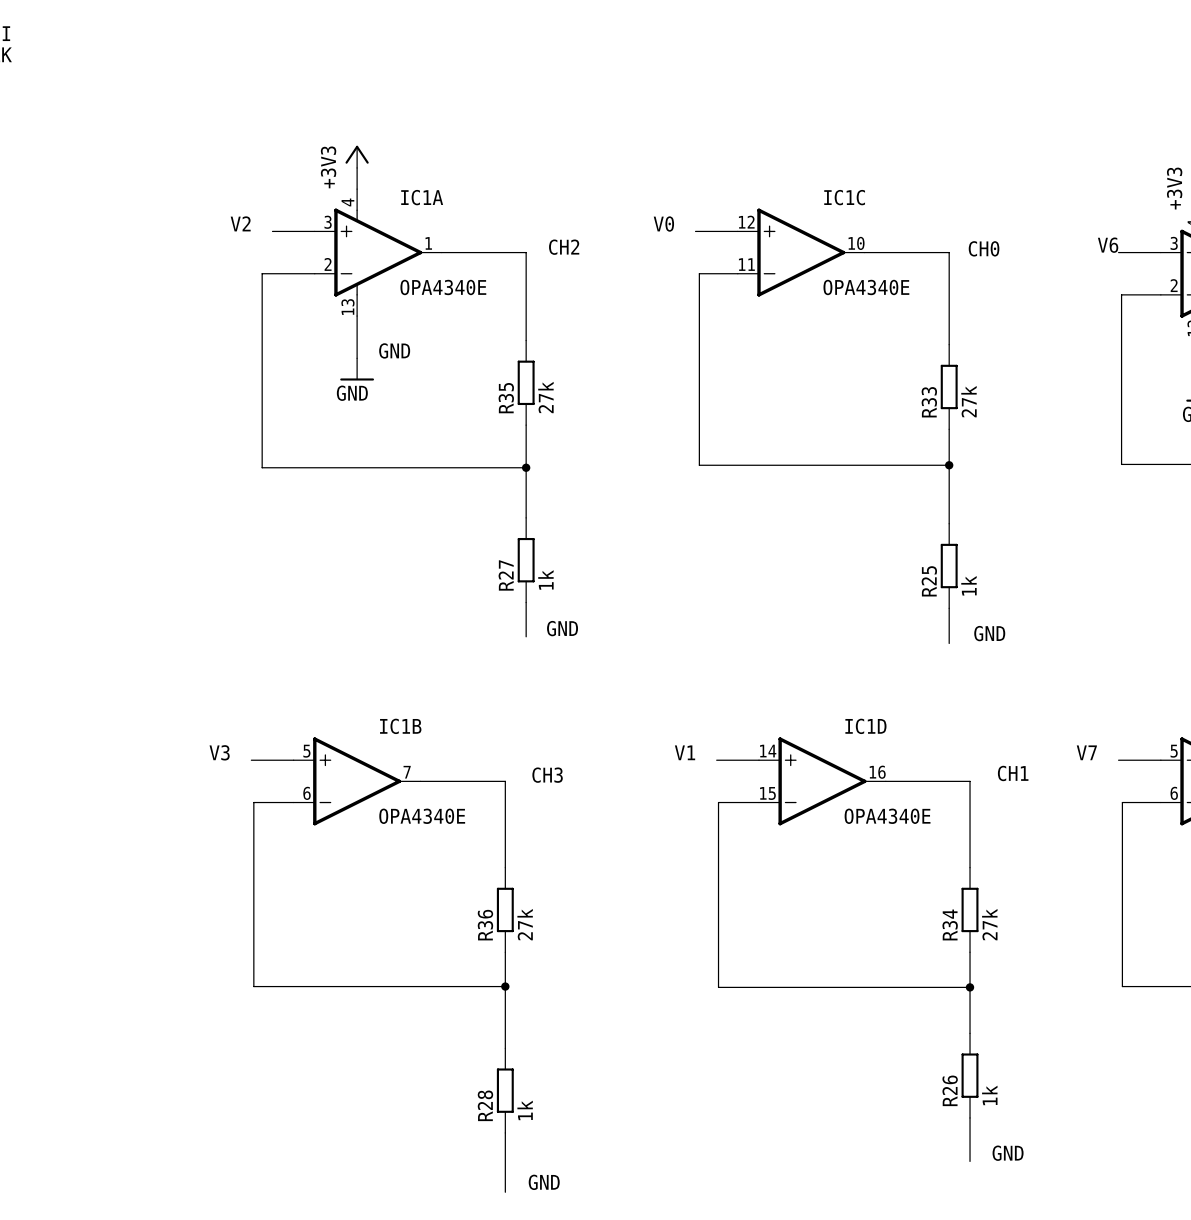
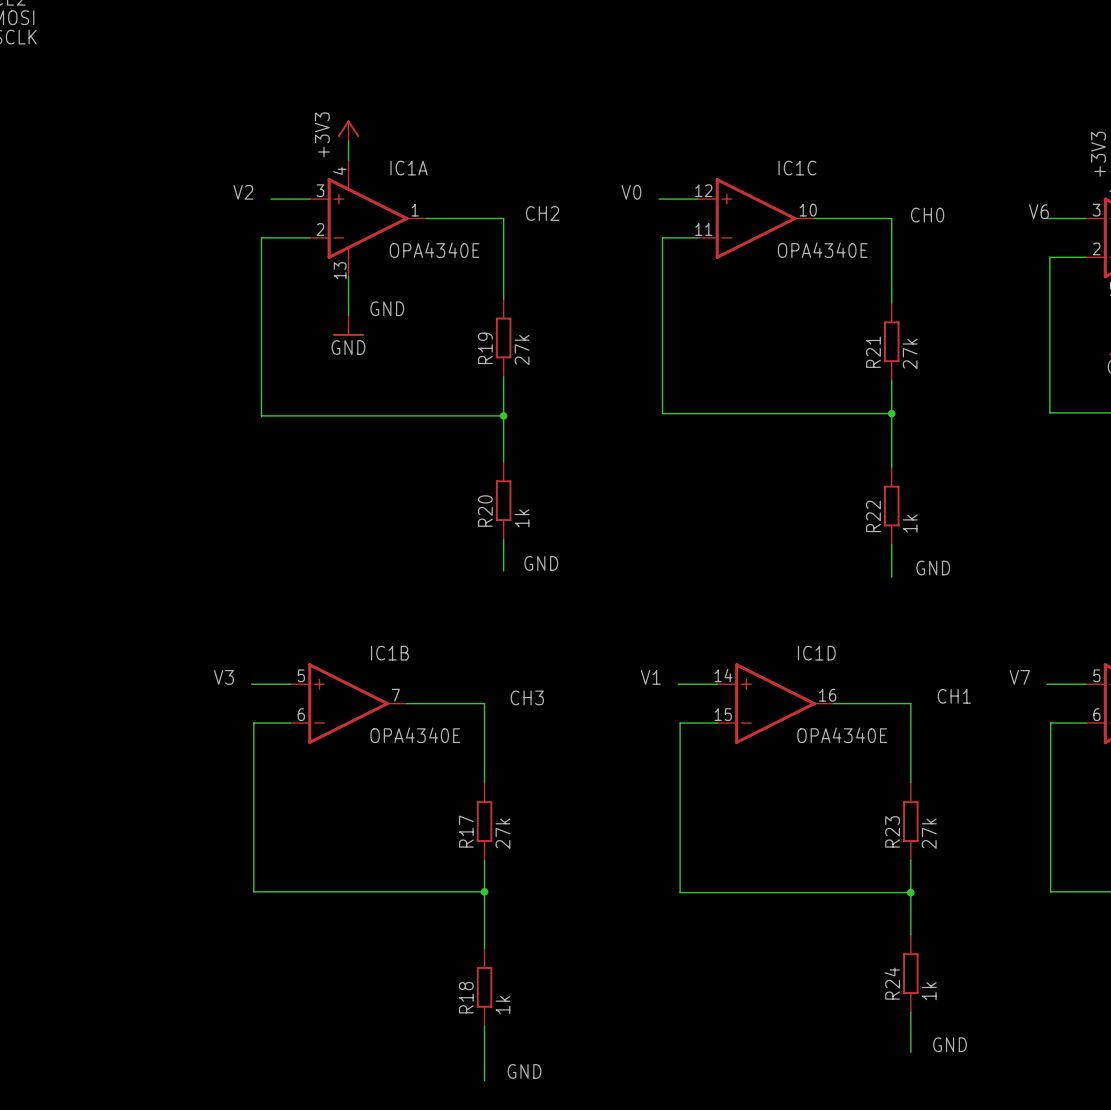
R35 name: R35 (506, 398) -> R19 (485, 348)
R33 name: R33 (929, 402) -> R21 (873, 352)
R27 name: R27 (506, 575) -> R20 (485, 511)
R25 name: R25 (929, 581) -> R22 (873, 516)
R34 name: R34 (950, 924) -> R23 (892, 831)
R36 name: R36 (485, 925) -> R17 (466, 831)
R26 name: R26 (950, 1090) -> R24 (892, 983)
R28 name: R28 (485, 1105) -> R18 (466, 997)

